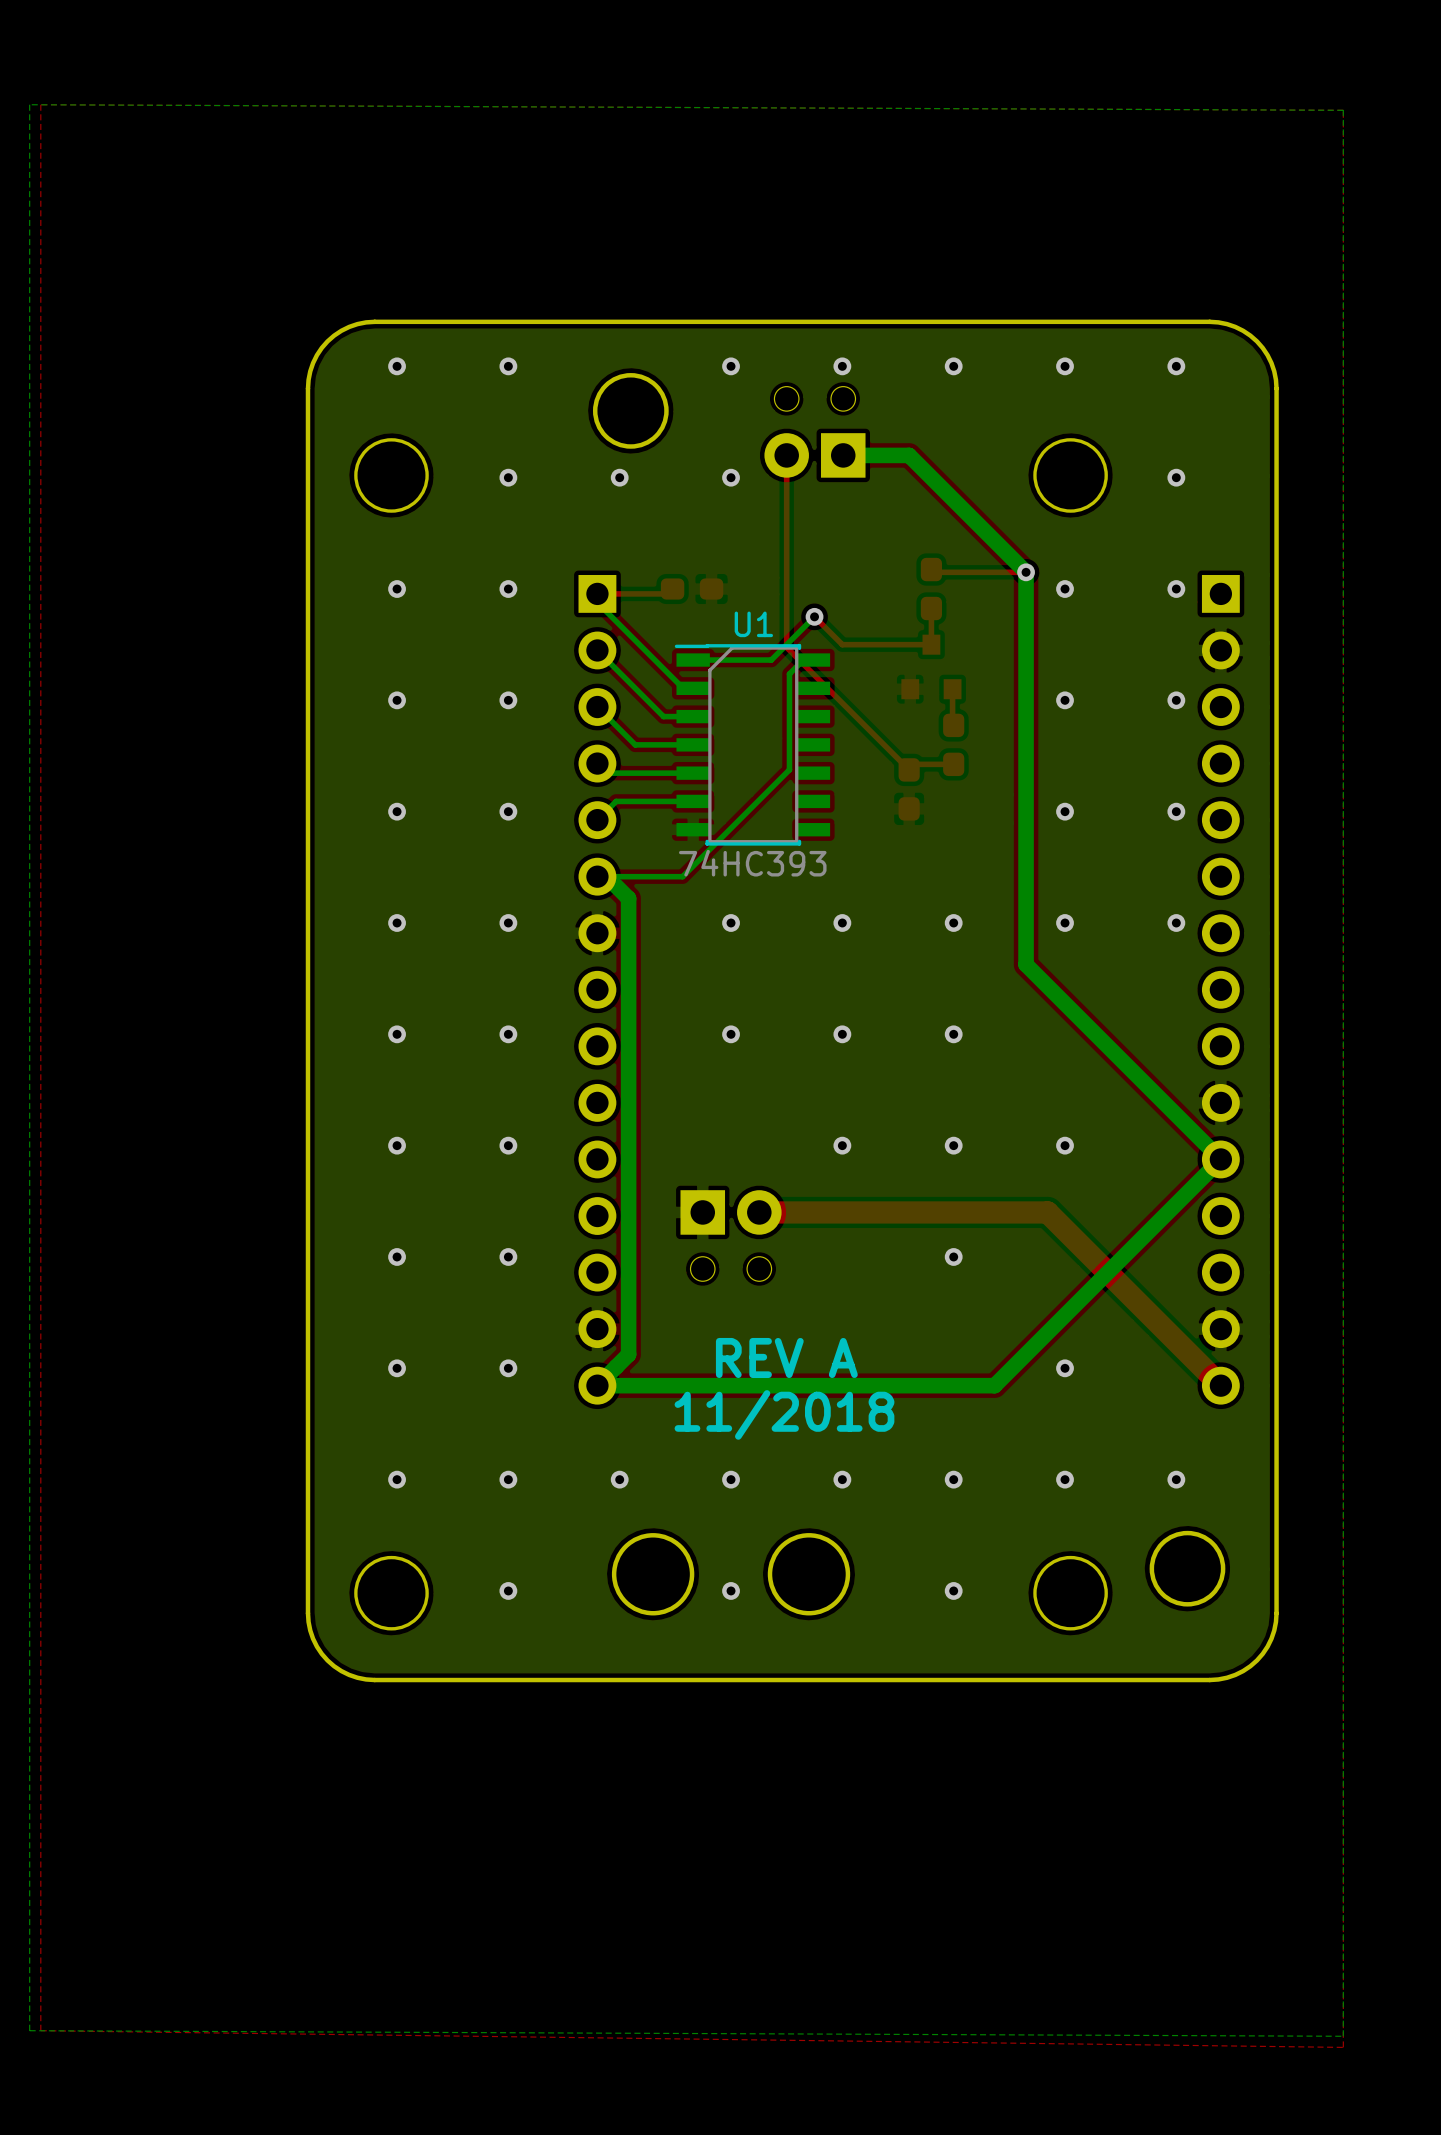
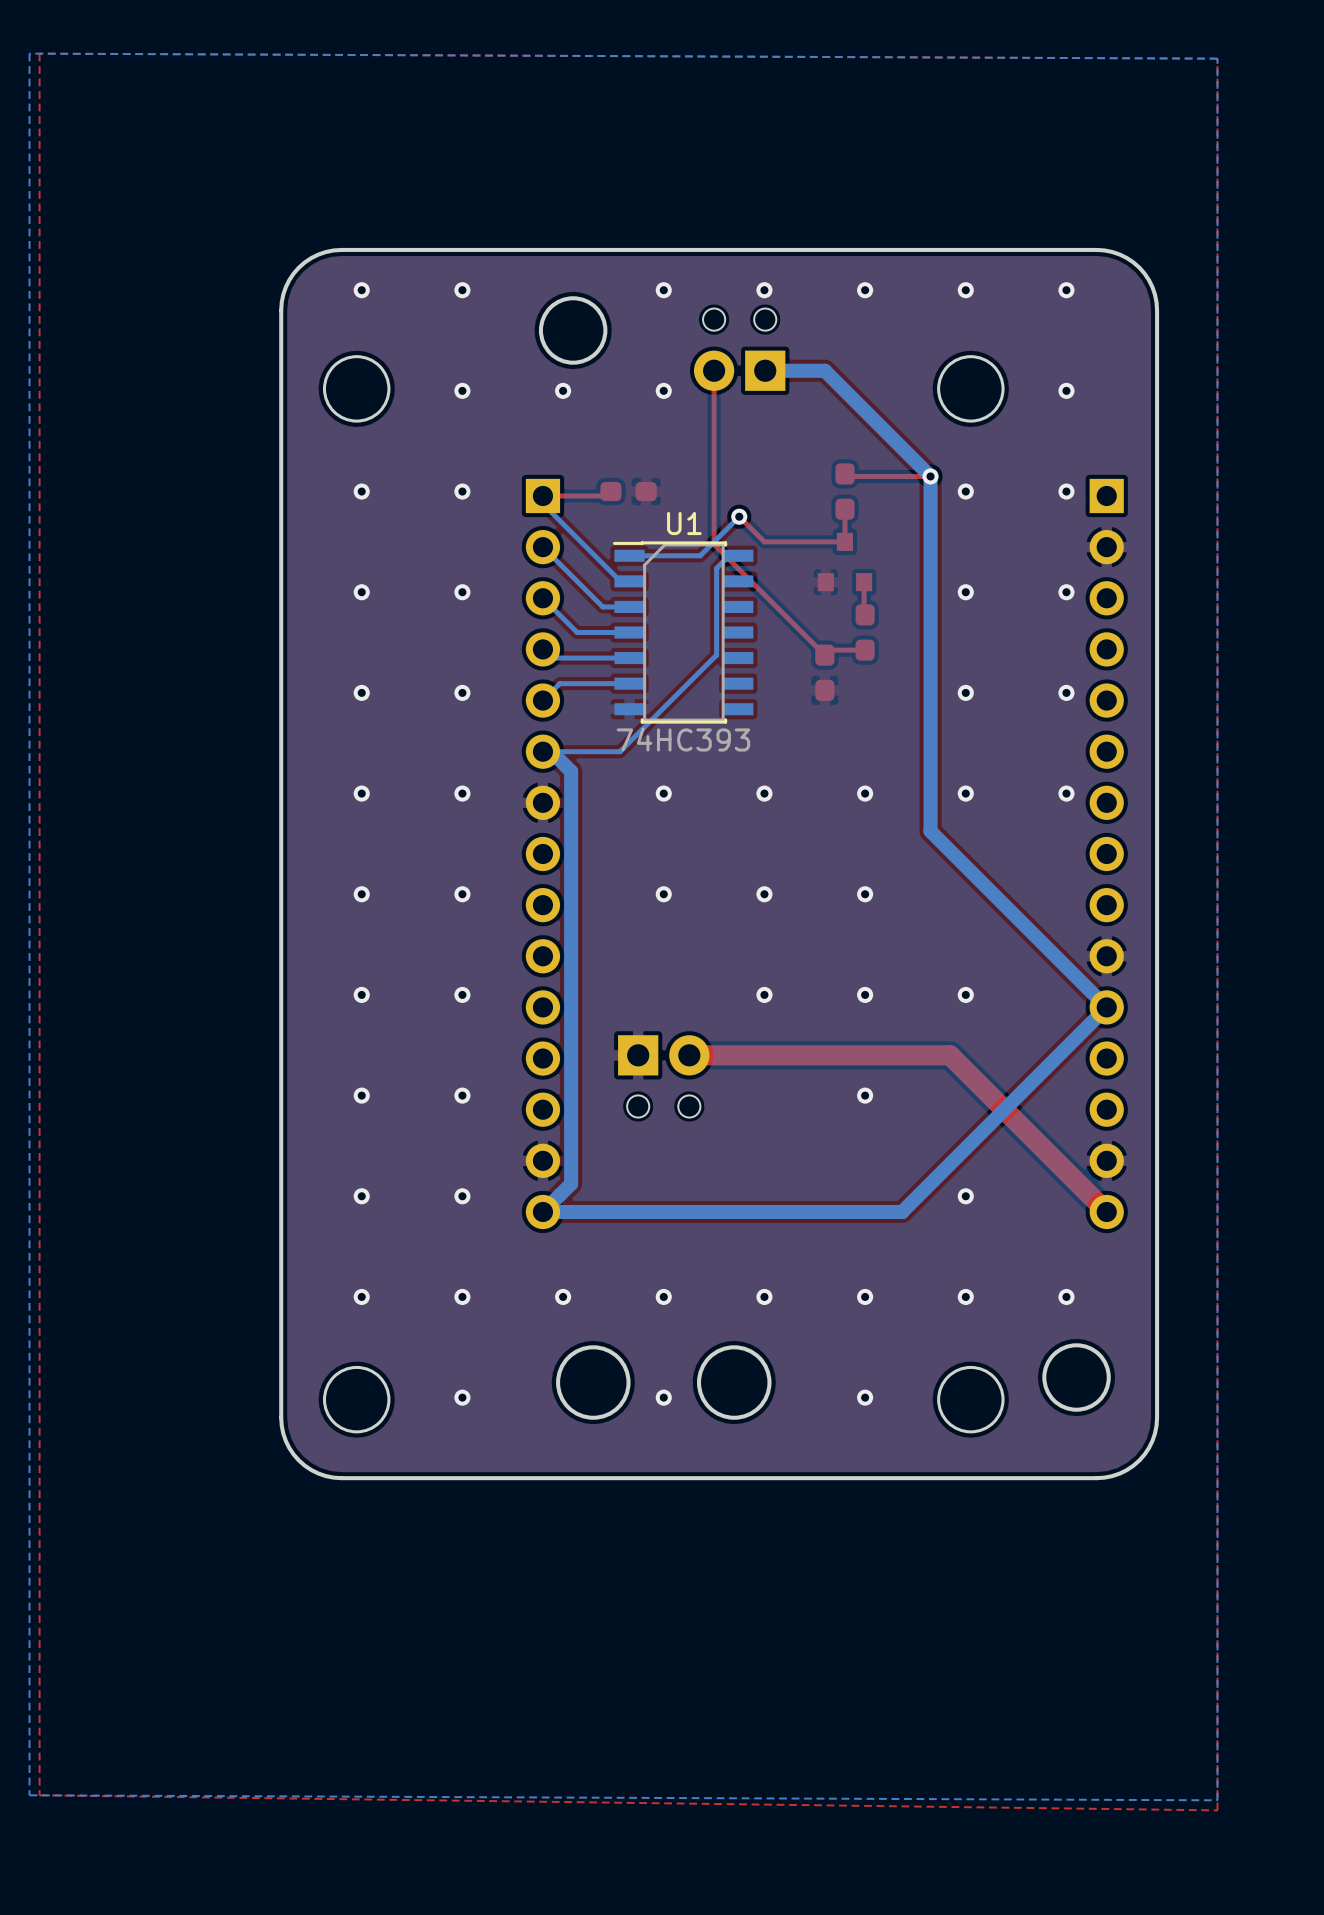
text: REV A (786, 1357) -> none
text: 11/2018 (784, 1414) -> none

